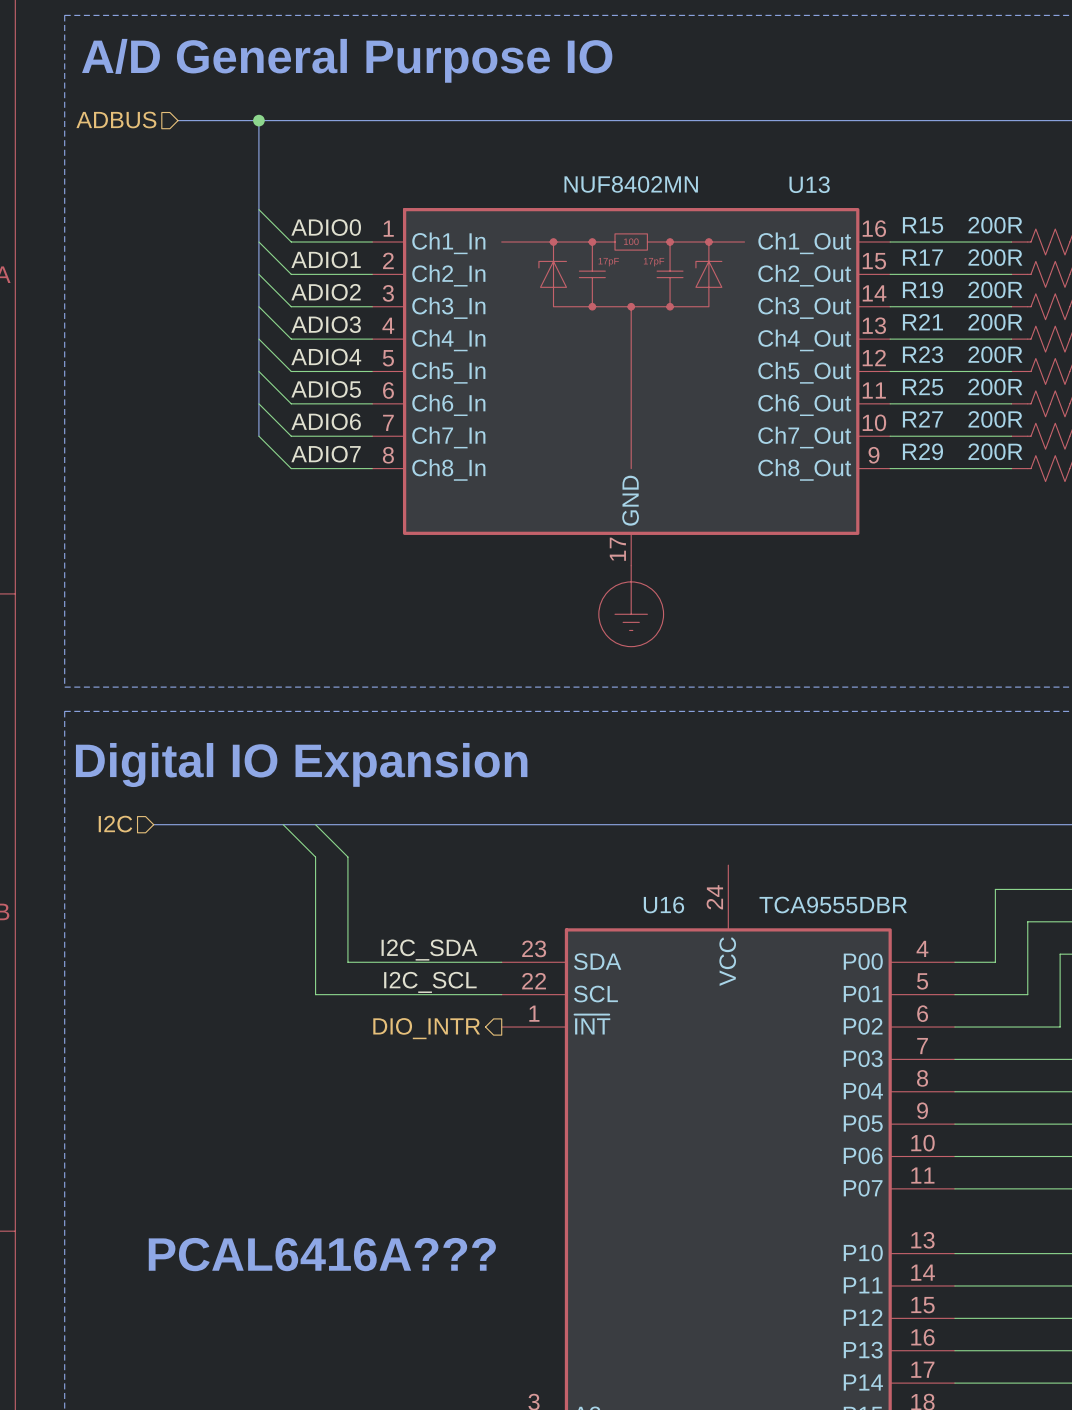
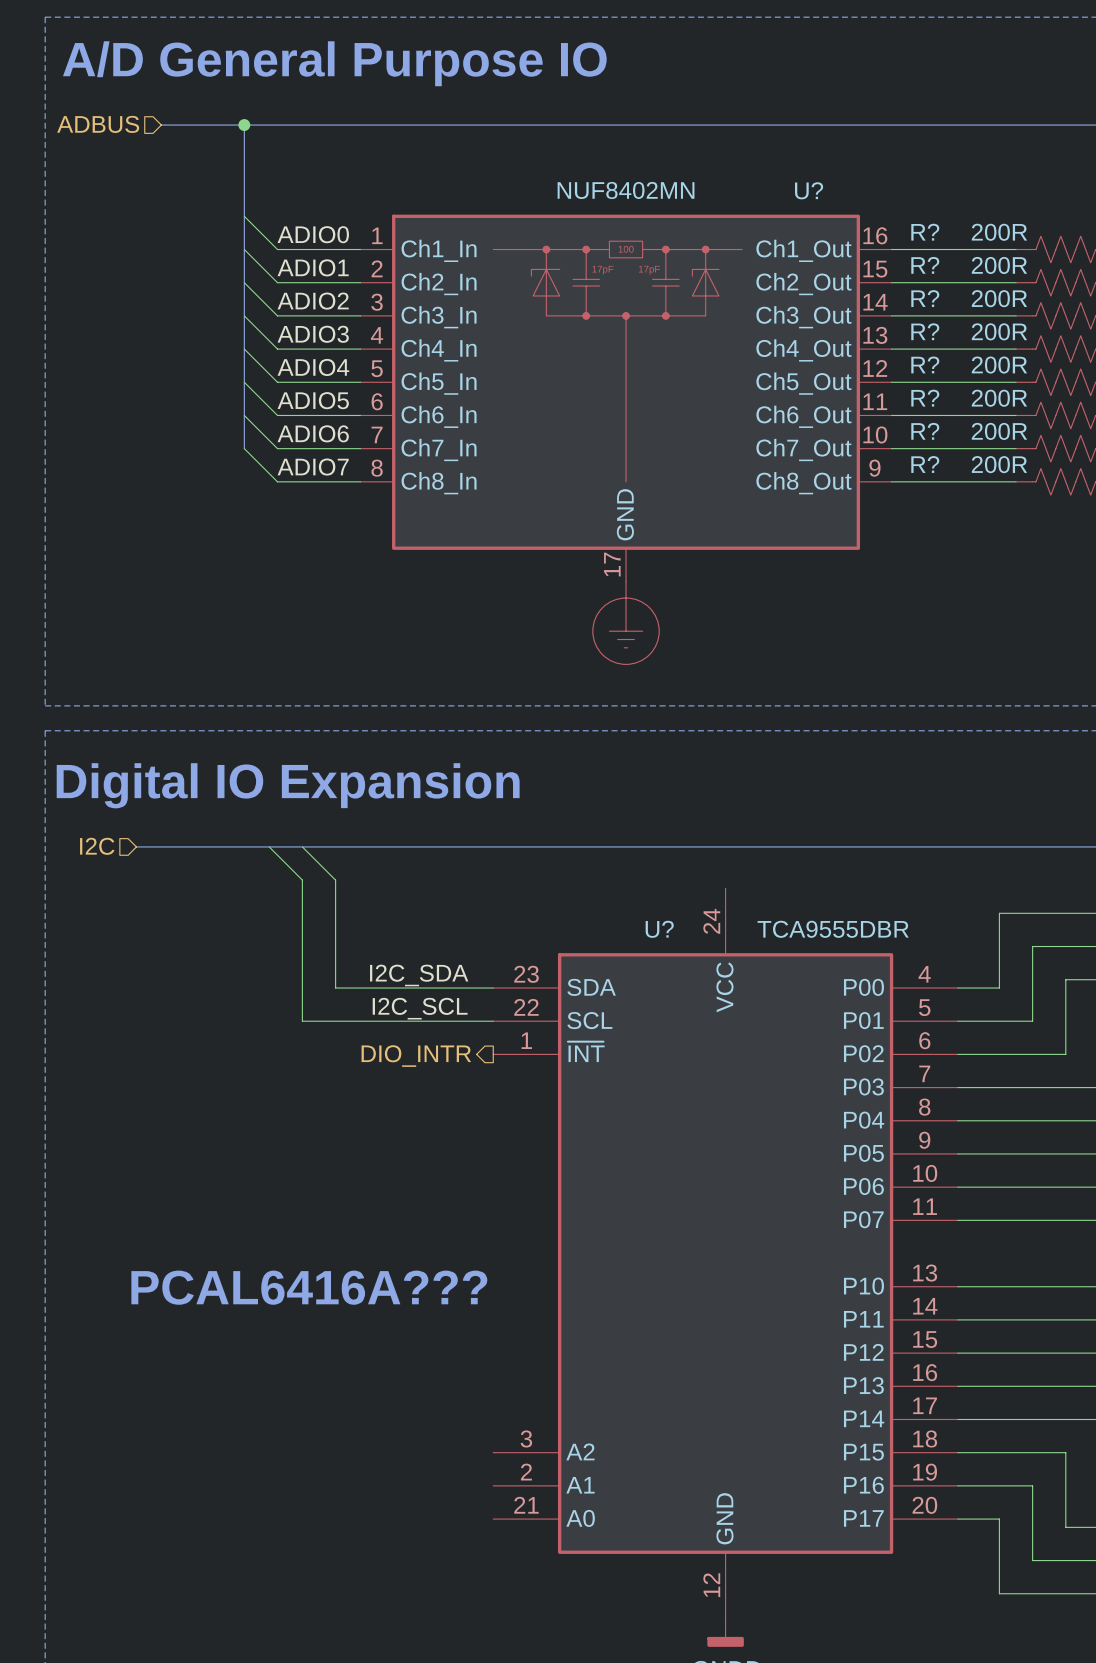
U13 name: U13 (809, 184) -> U? (809, 190)
R15 name: R15 (923, 225) -> R? (925, 232)
R17 name: R17 (922, 257) -> R? (925, 265)
R19 name: R19 (922, 289) -> R? (925, 298)
R21 name: R21 (922, 322) -> R? (925, 331)
R23 name: R23 (922, 354) -> R? (925, 364)
R25 name: R25 (923, 387) -> R? (925, 398)
R27 name: R27 (922, 419) -> R? (925, 431)
R29 name: R29 (922, 451) -> R? (925, 464)
U16 name: U16 (663, 905) -> U? (659, 929)

